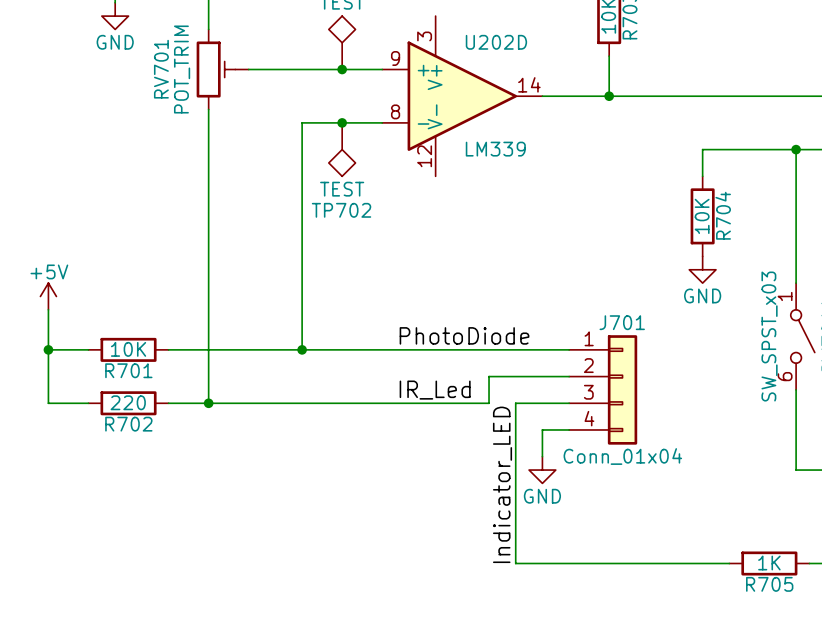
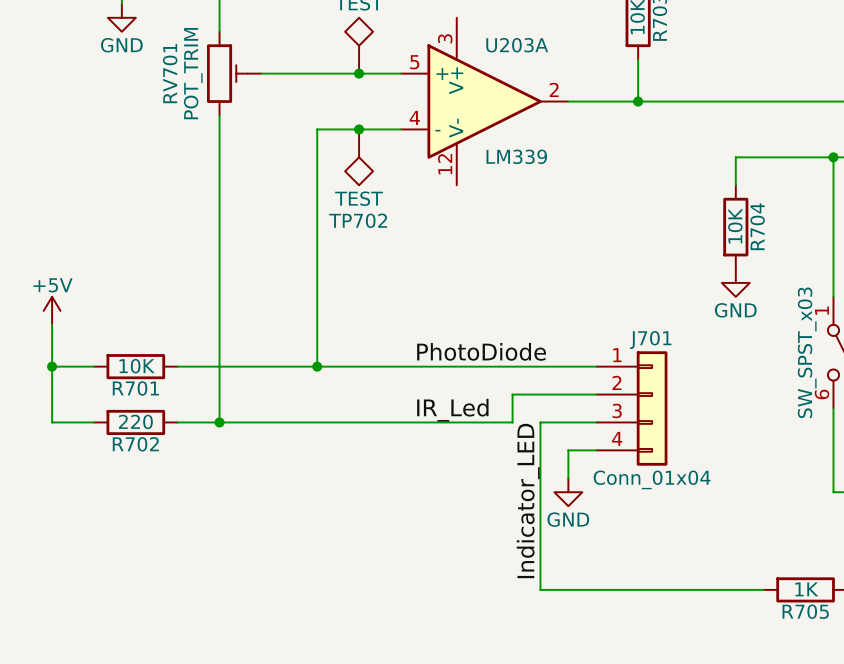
U202D name: U202D (496, 42) -> U203A (517, 45)
U202D pin number: 9 (395, 58) -> 5 (414, 62)
U202D pin number: 14 (529, 84) -> 2 (554, 89)
U202D pin number: 8 (395, 111) -> 4 (414, 117)

